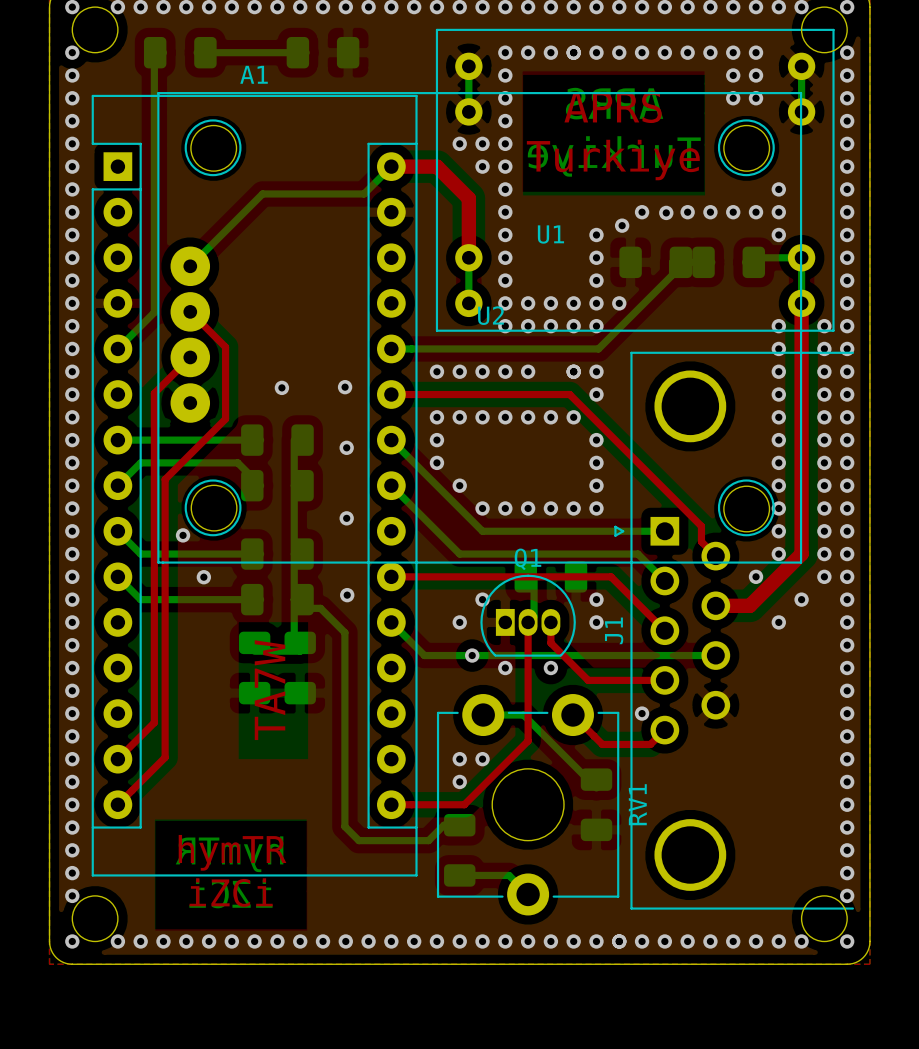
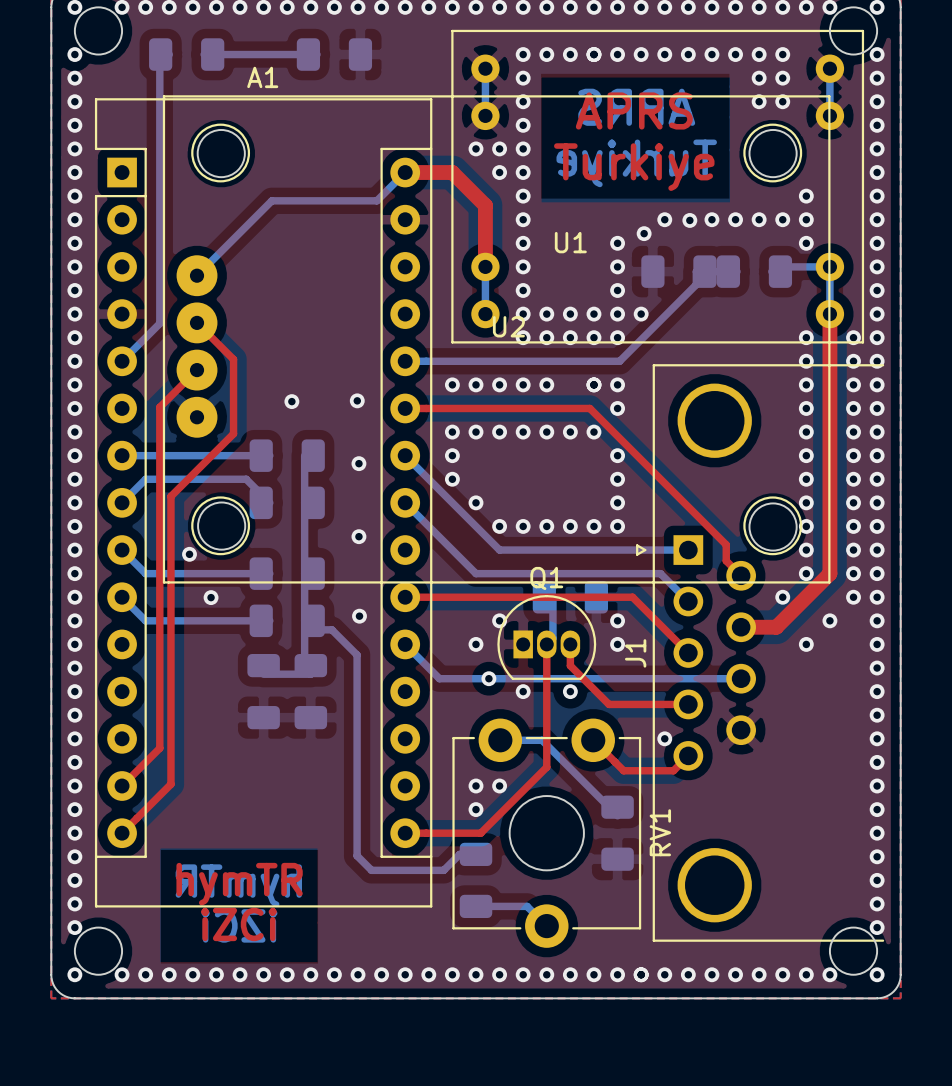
text: TA7W (270, 690) -> none

